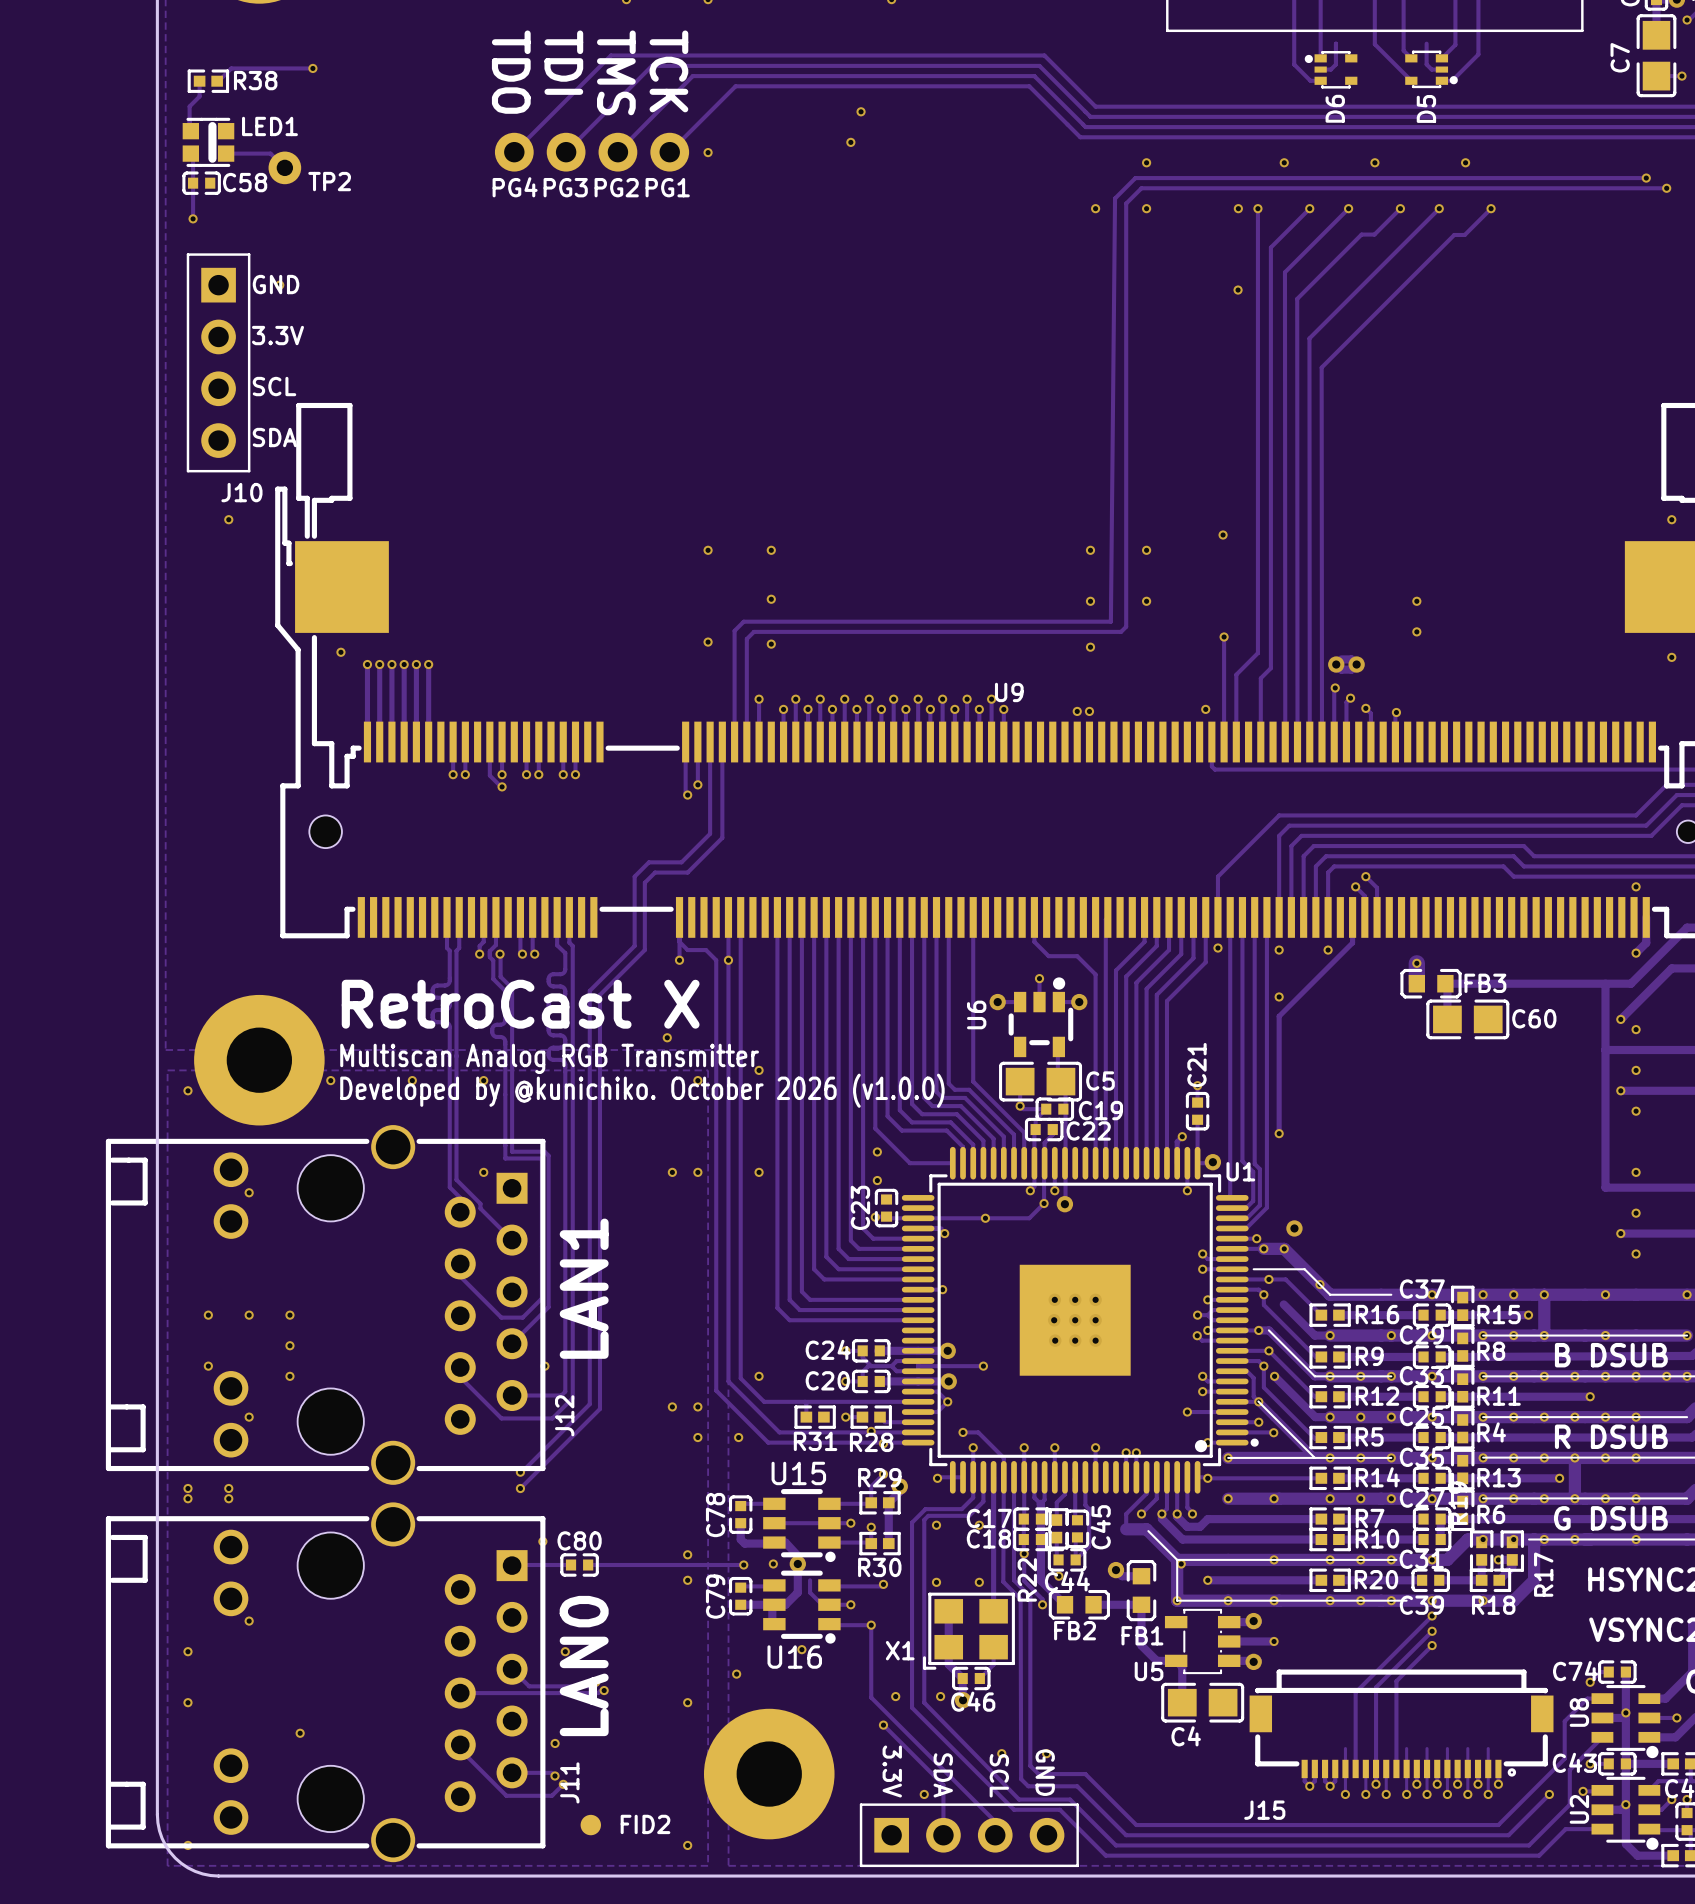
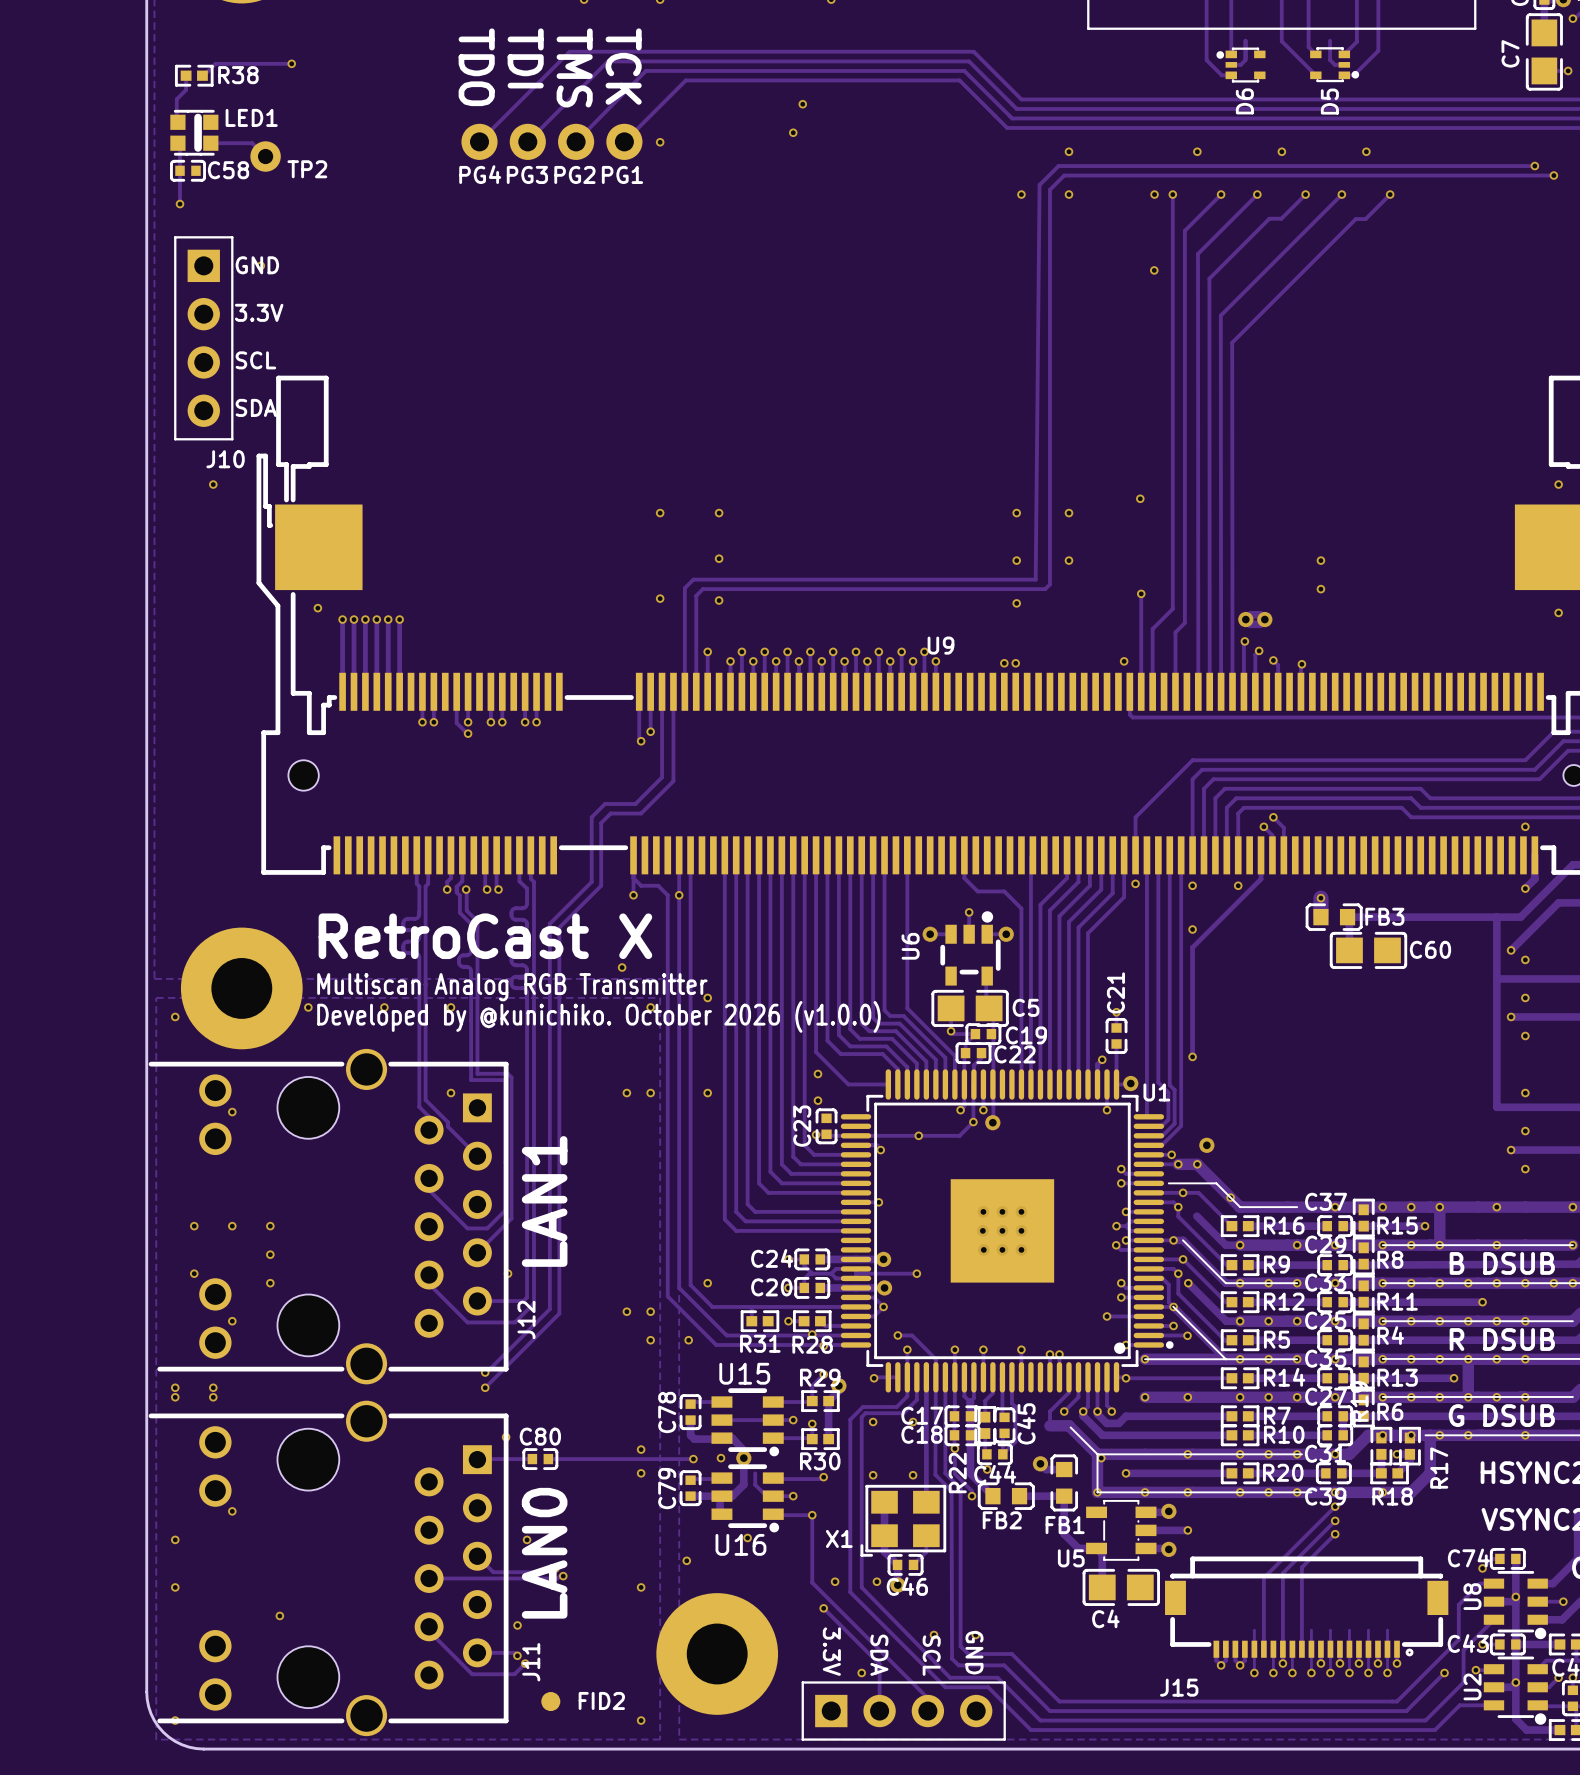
J12 footprint: [105, 1125, 546, 1485] -> [148, 1048, 509, 1385]
J11 footprint: [105, 1502, 546, 1863] -> [148, 1400, 509, 1737]

